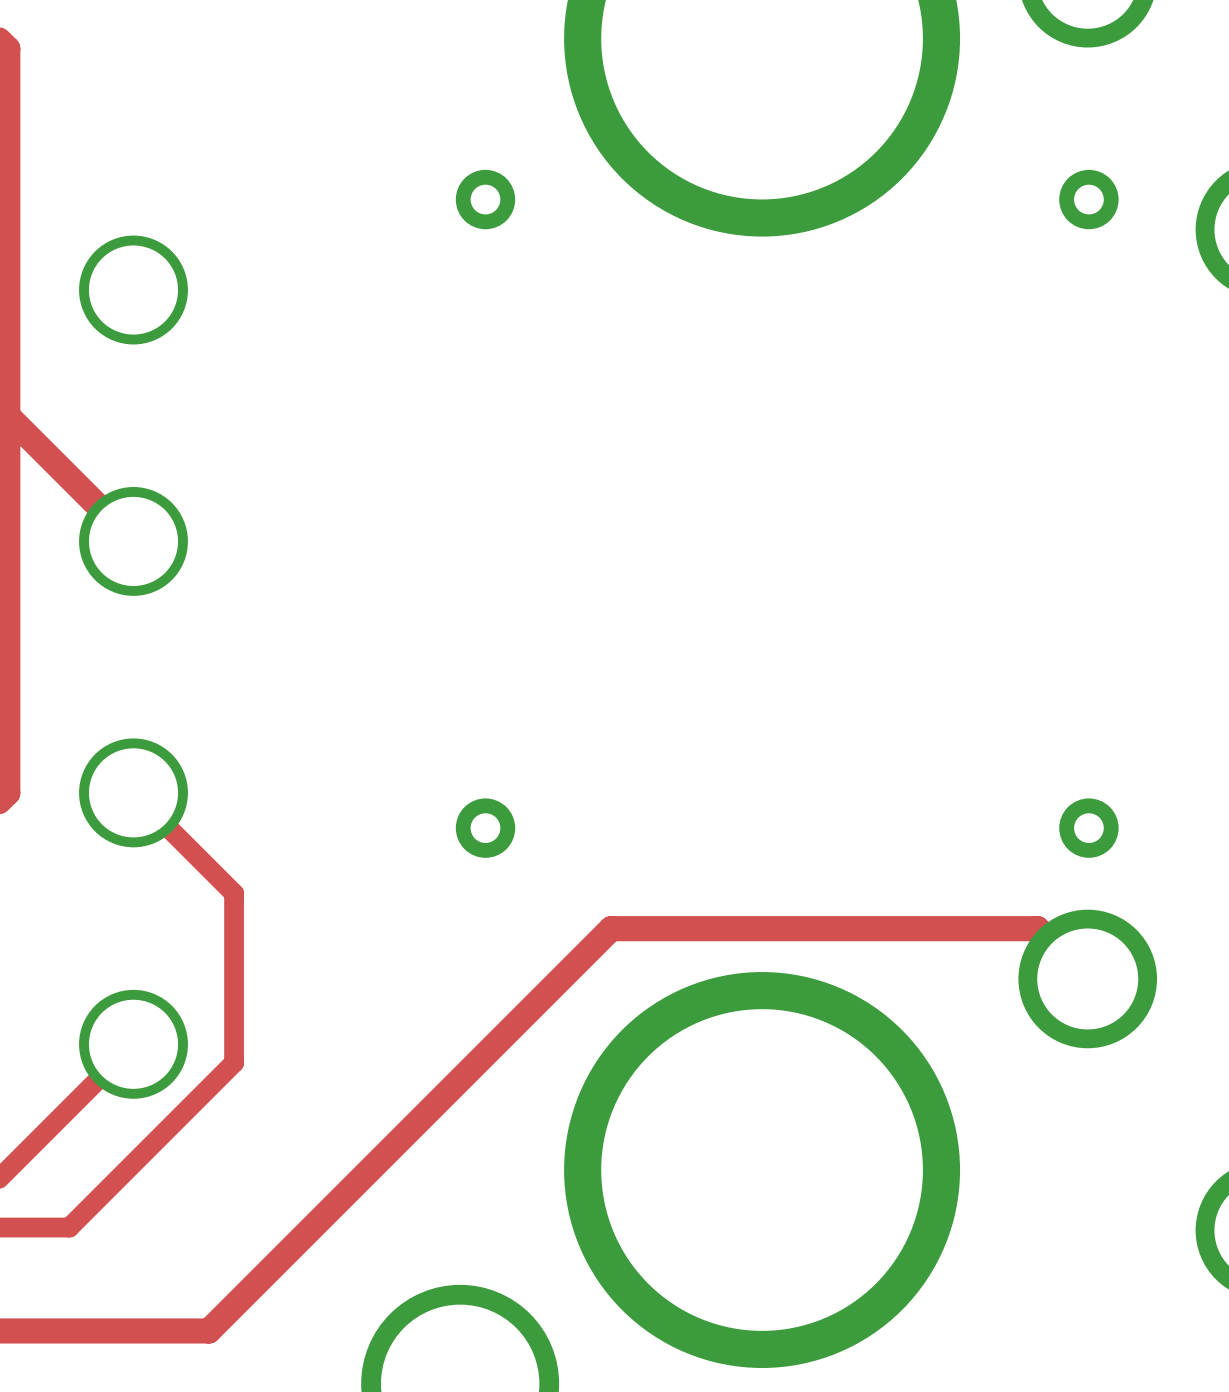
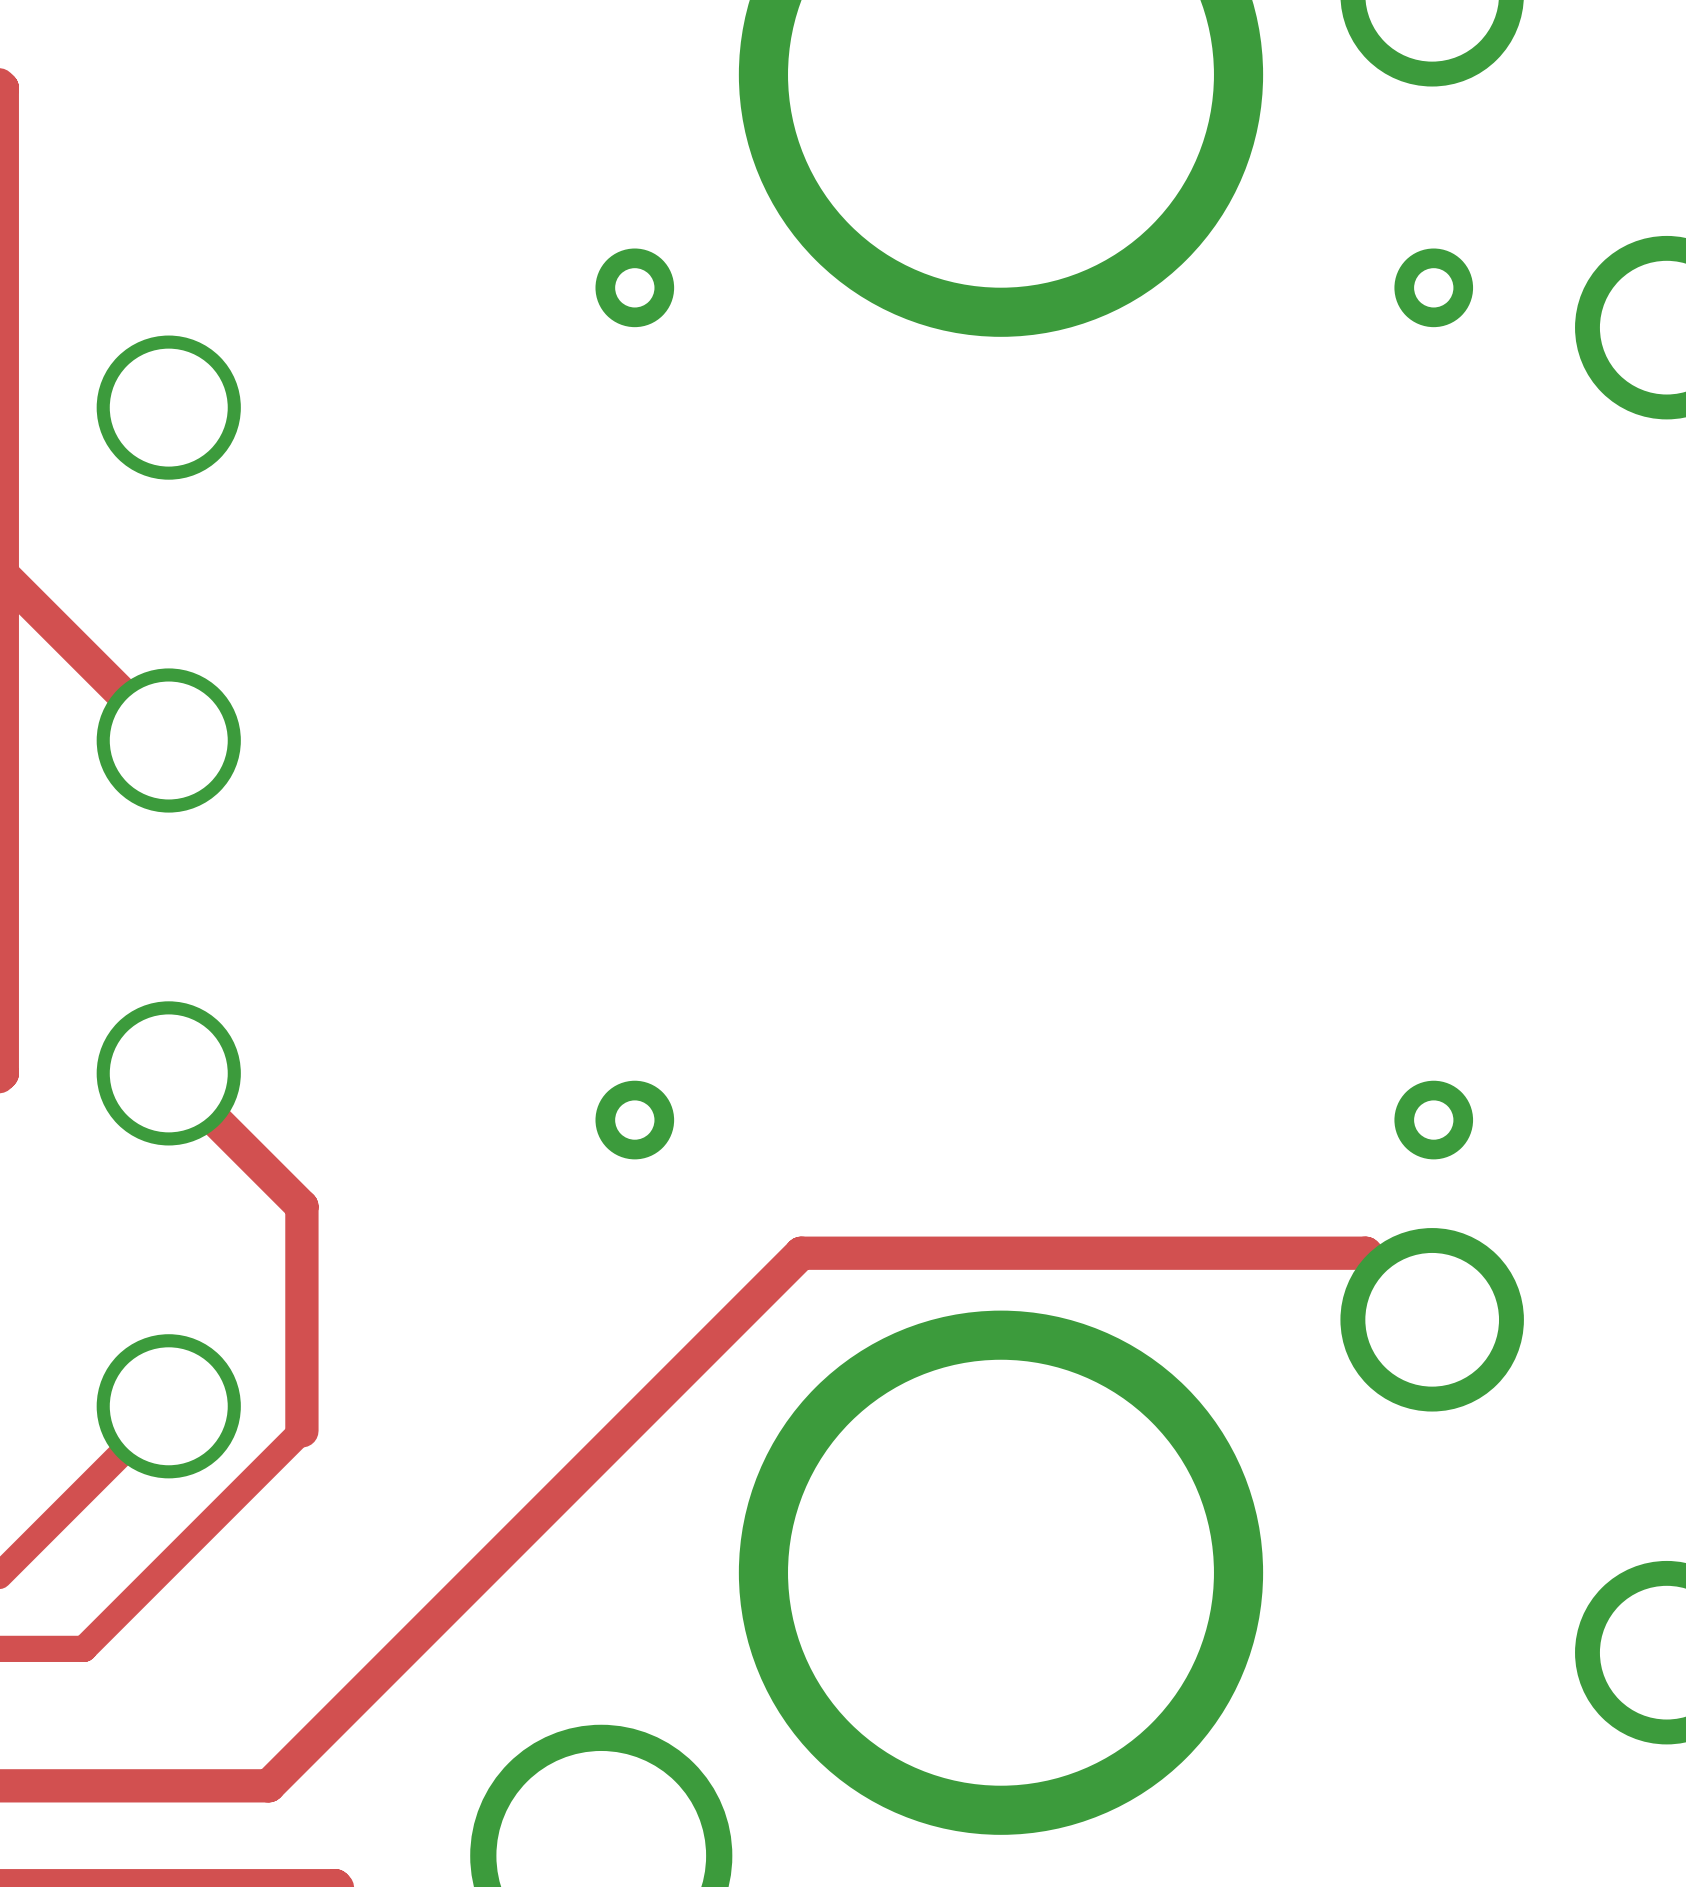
track width: thin (133, 792) (234, 893) (234, 1062) -> thick (168, 1073) (301, 1206) (301, 1430)

